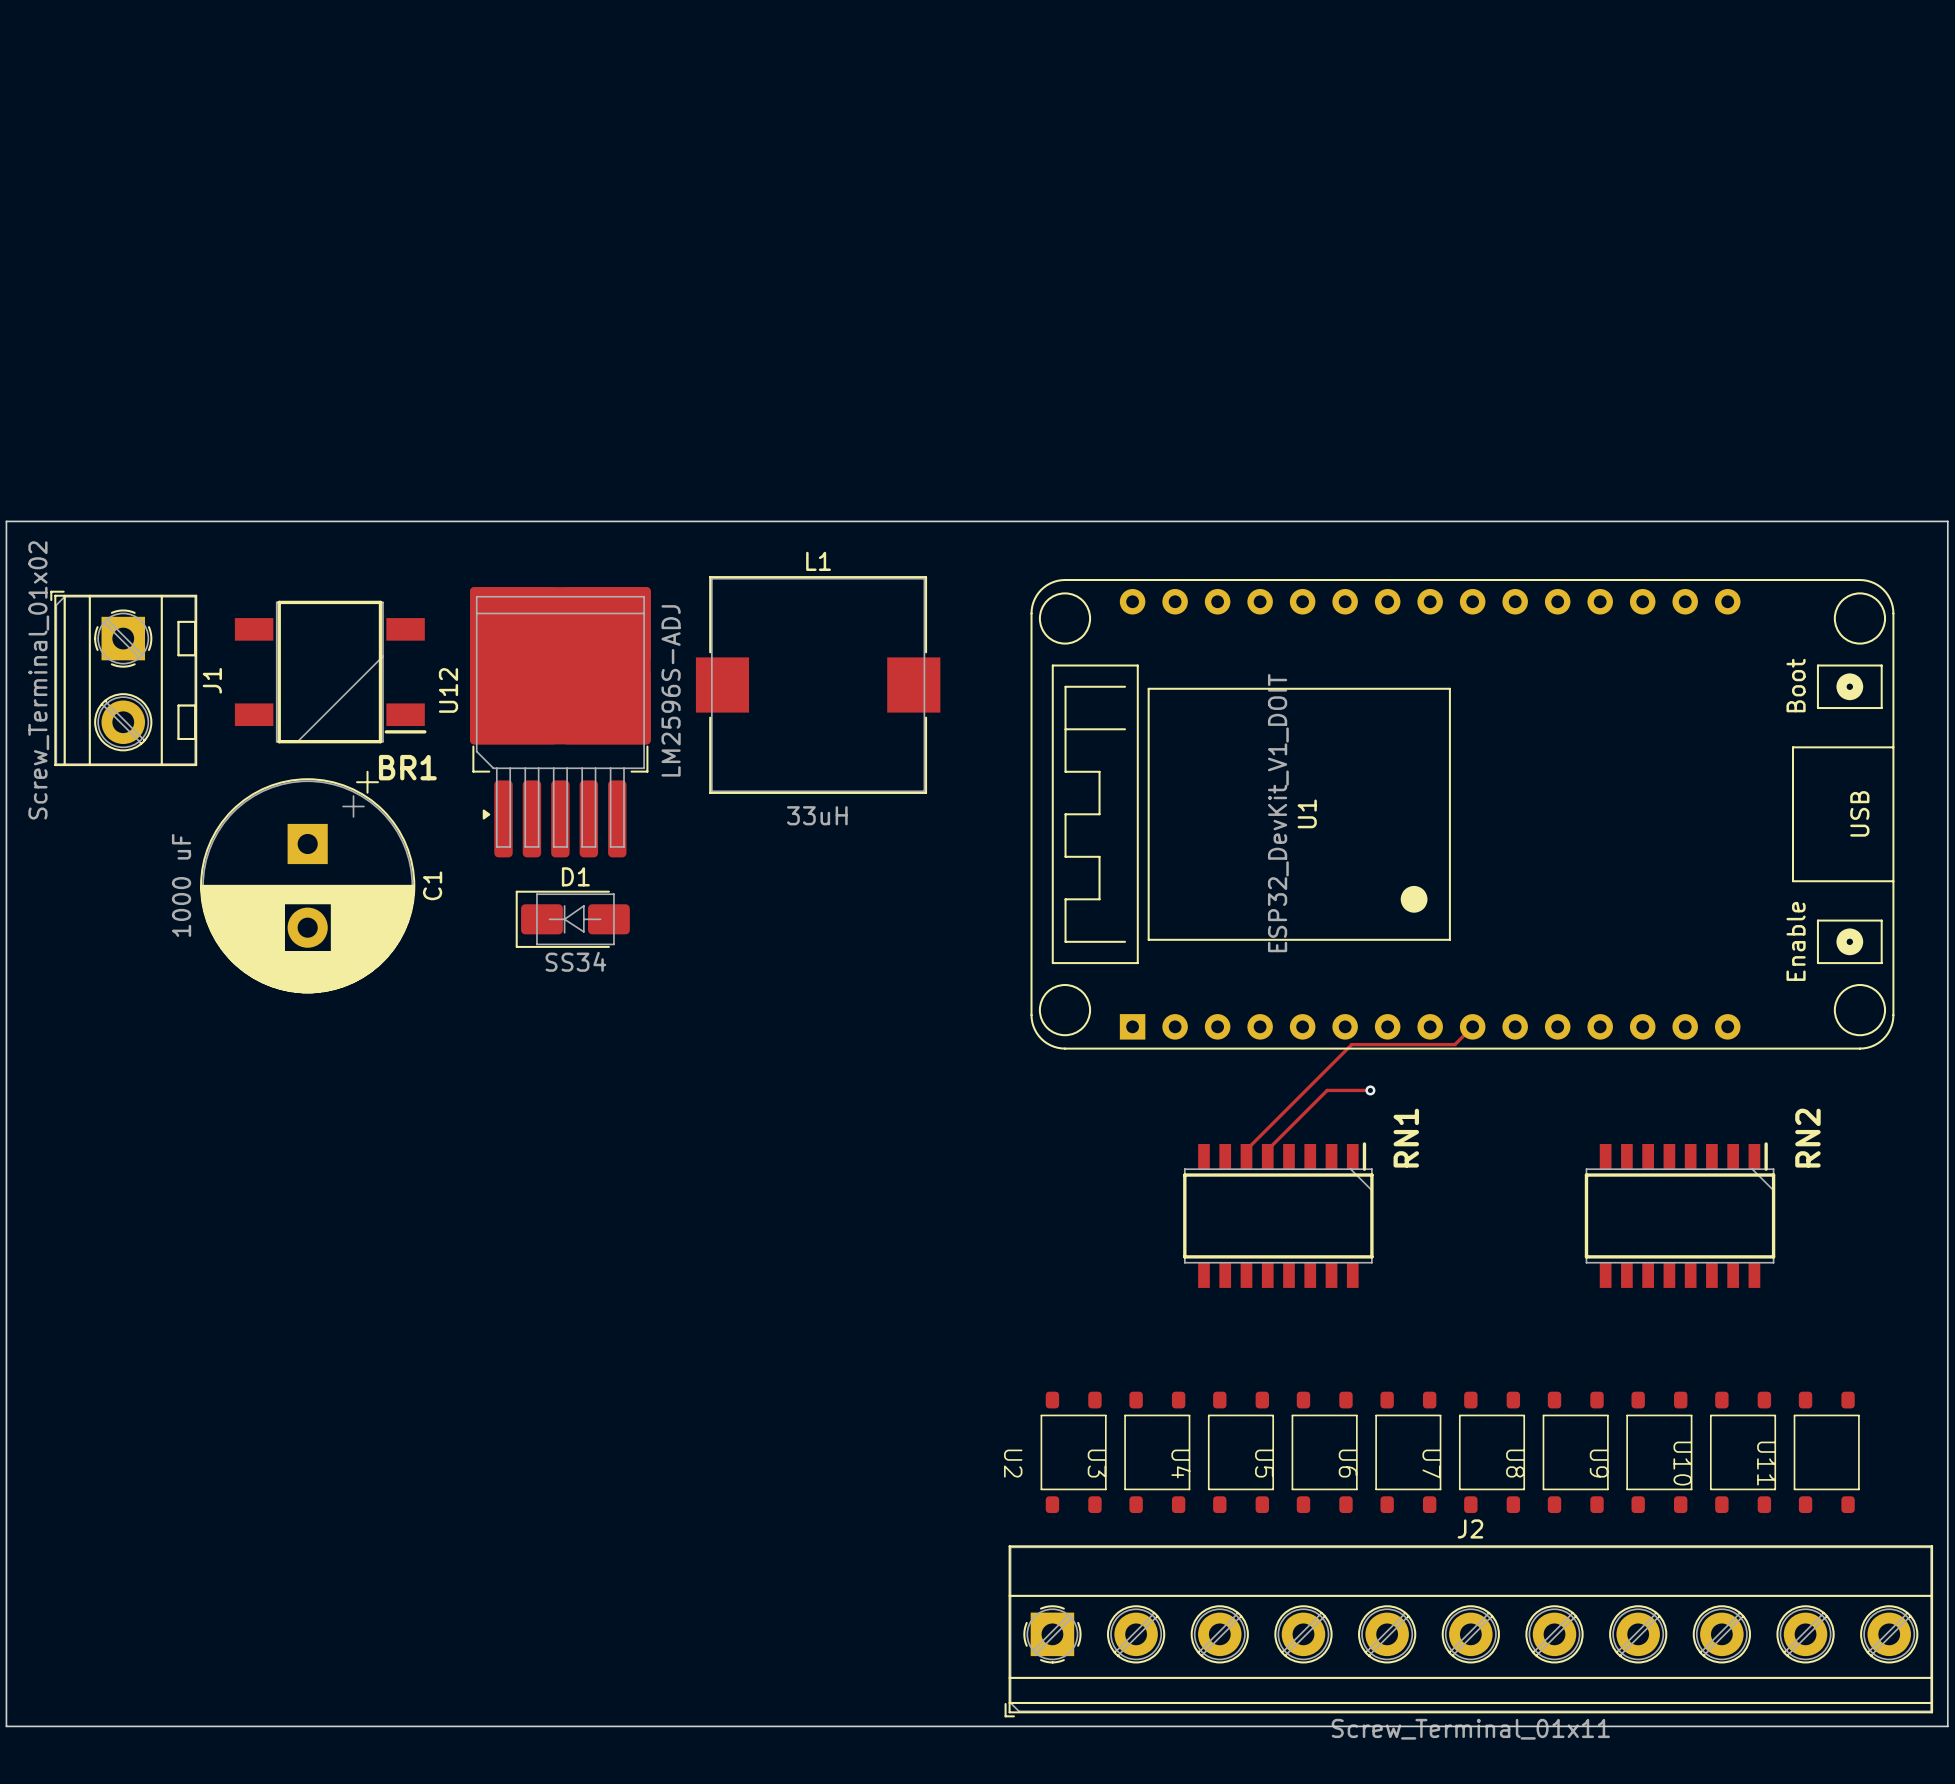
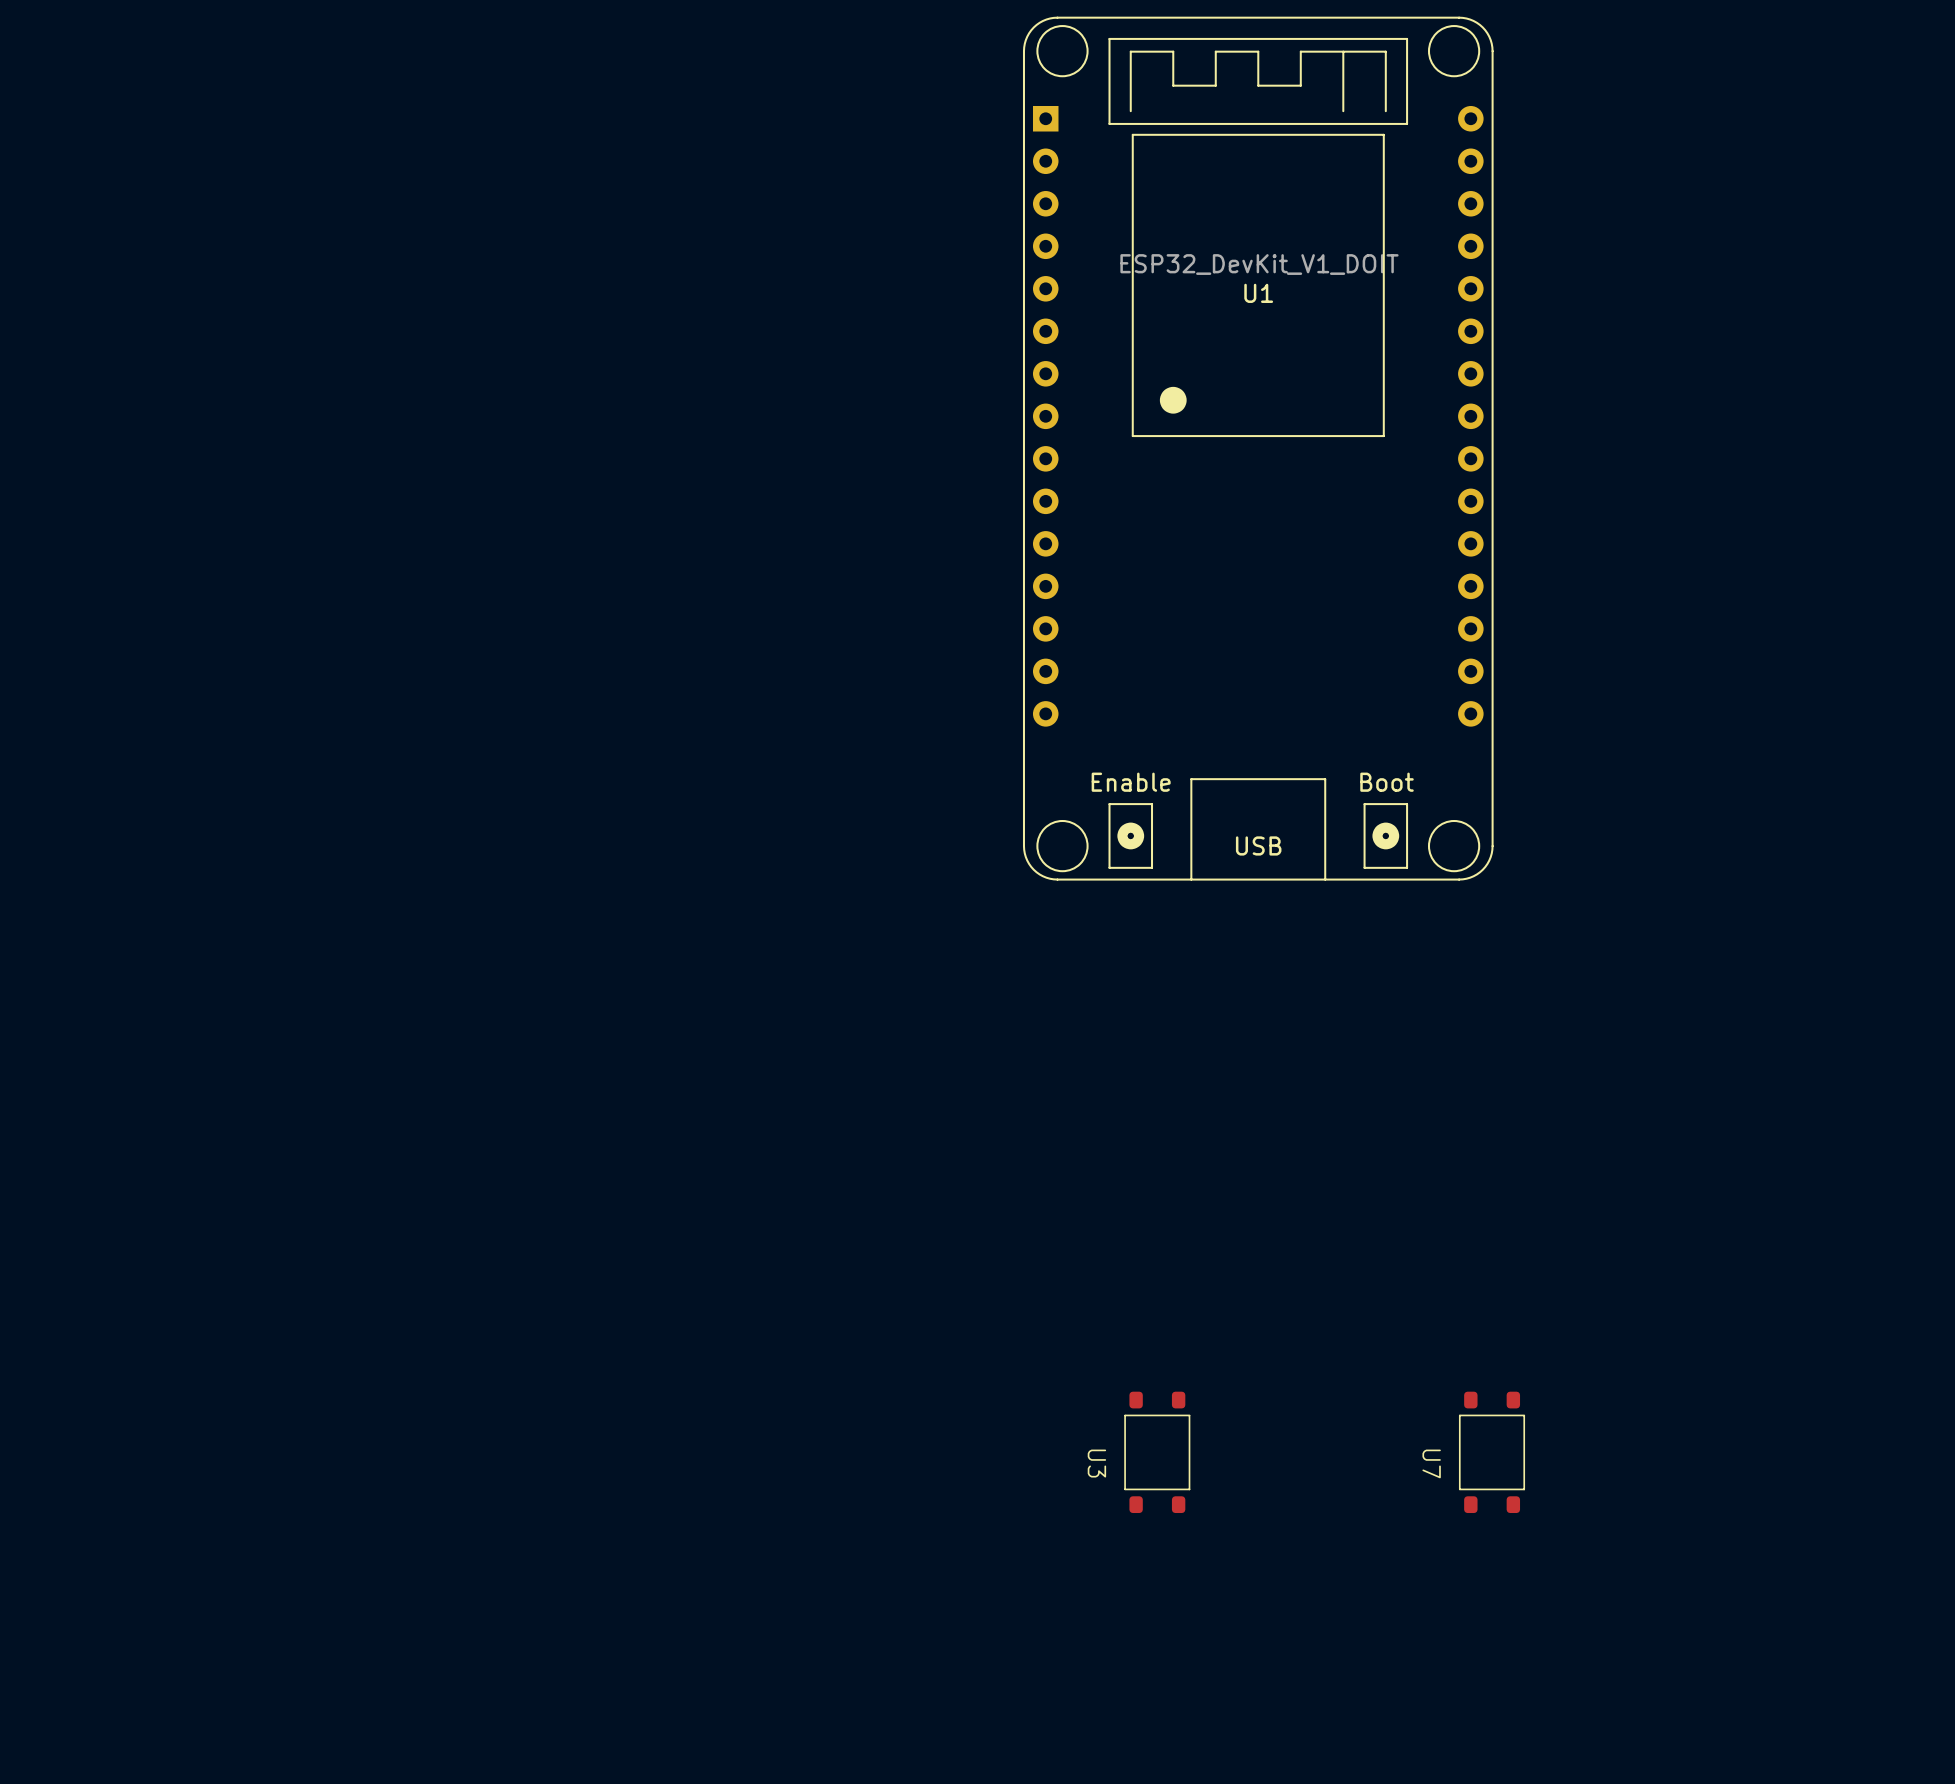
board edge: (6, 521) (1947, 521) (1947, 1726) (6, 1726) (6, 521) -> none
BR1: (330, 672) -> none
J1: Screw_Terminal_01x02 (123, 678) -> none
L1: 33uH (818, 685) -> none
U12: LM2596S-ADJ (560, 722) -> none
U1 rotation: 0° (1462, 814) -> 90° clockwise (1258, 448)
C1: 1000 uF (307, 882) -> none
D1: SS34 (572, 919) -> none
track: (1472, 1026) (1454, 1044) (1351, 1044) (1246, 1149) (1246, 1156) -> none
track: (1370, 1090) (1327, 1090) (1267, 1149) (1267, 1156) -> none
via: (1370, 1090) -> none
RN1: (1278, 1215) -> none
RN2: (1680, 1215) -> none
U2: (1073, 1452) -> none
U4: (1241, 1452) -> none
U5: (1324, 1452) -> none
U6: (1408, 1452) -> none
U8: (1575, 1452) -> none
U9: (1659, 1452) -> none
U10: (1743, 1452) -> none
U11: (1826, 1452) -> none
J2: Screw_Terminal_01x11 (1468, 1631) -> none

